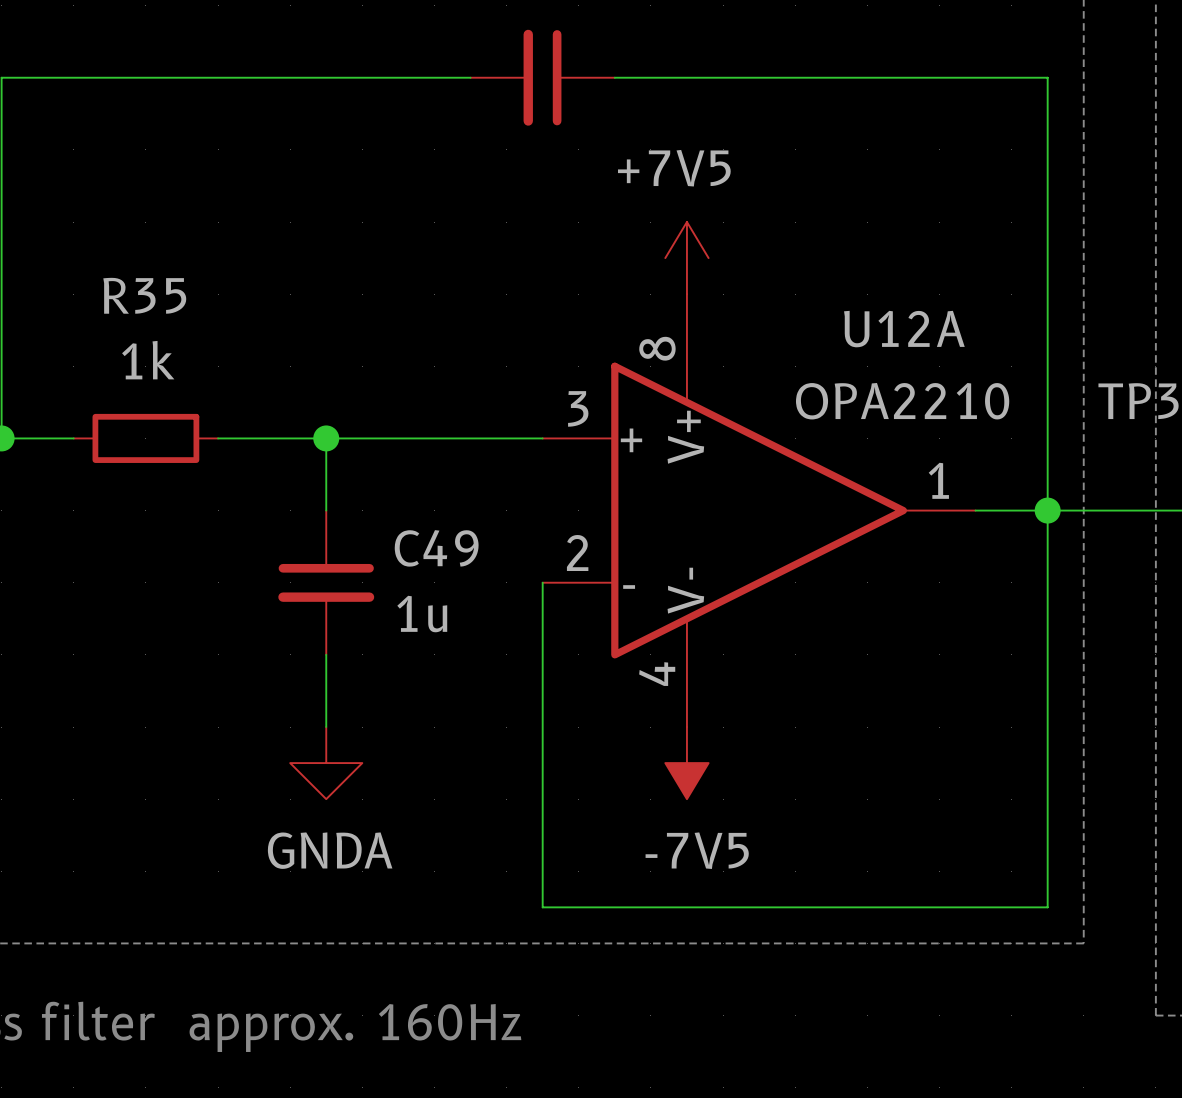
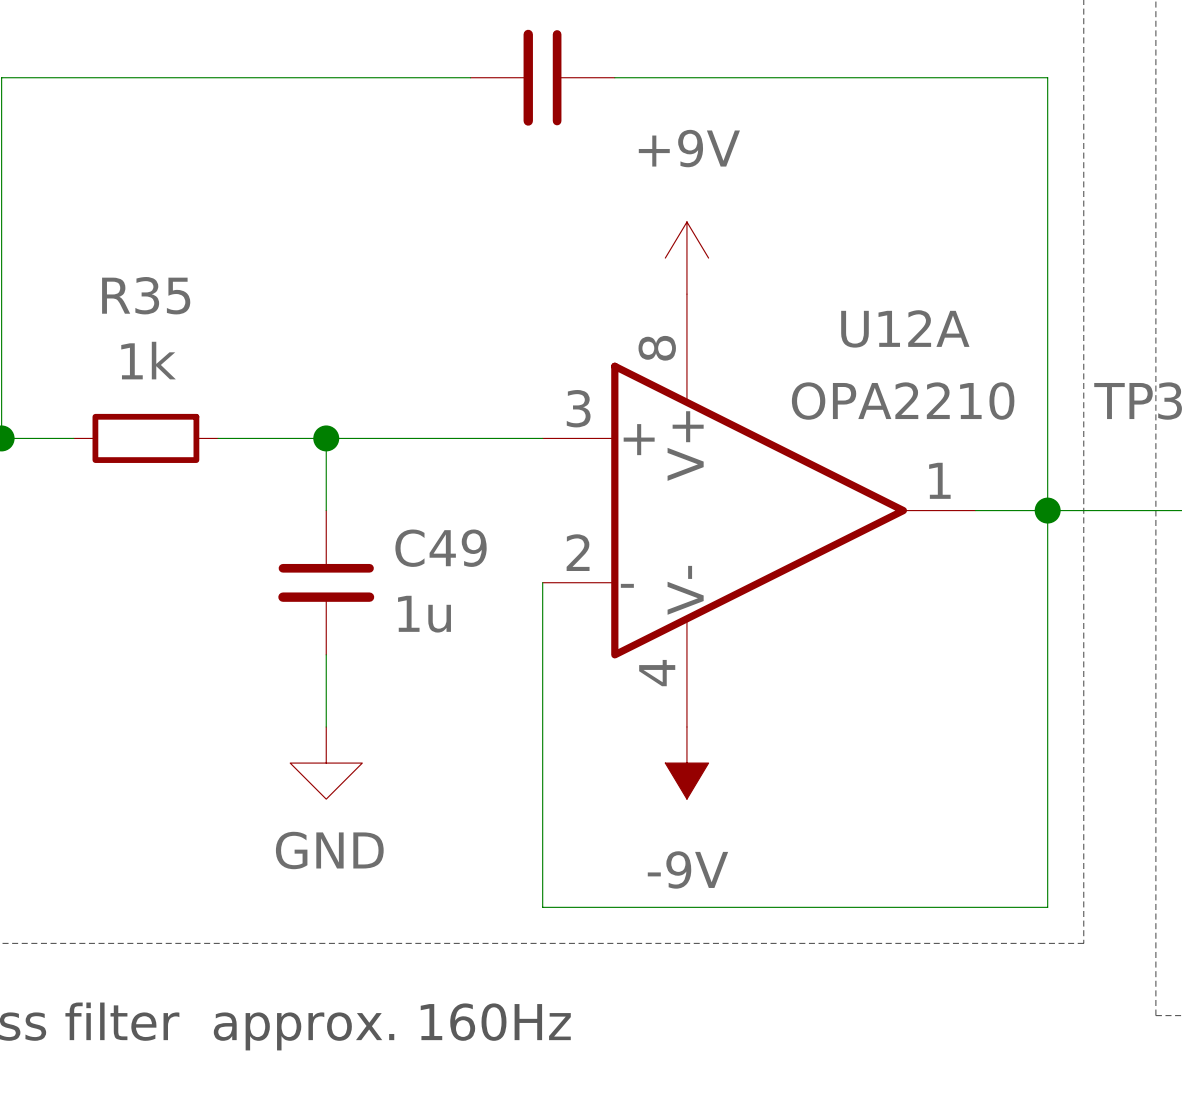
power symbol: +7V5 (686, 258) -> +9V (686, 258)
power symbol: GNDA (326, 763) -> GND (326, 763)
power symbol: -7V5 (686, 763) -> -9V (686, 763)

